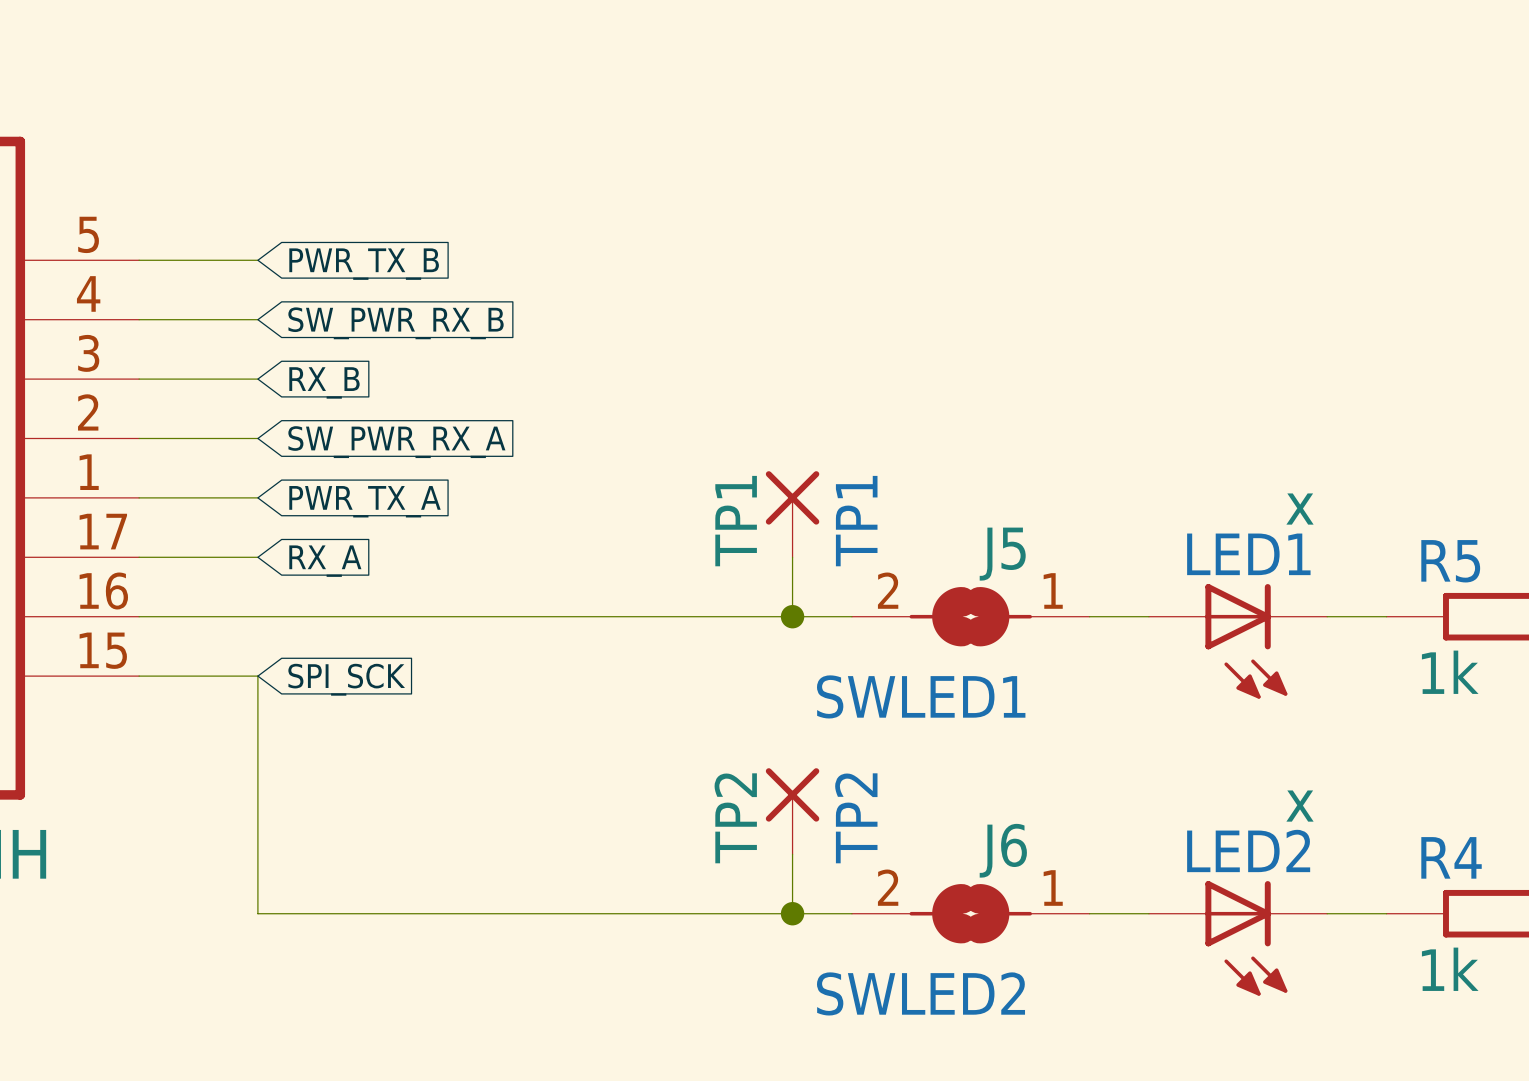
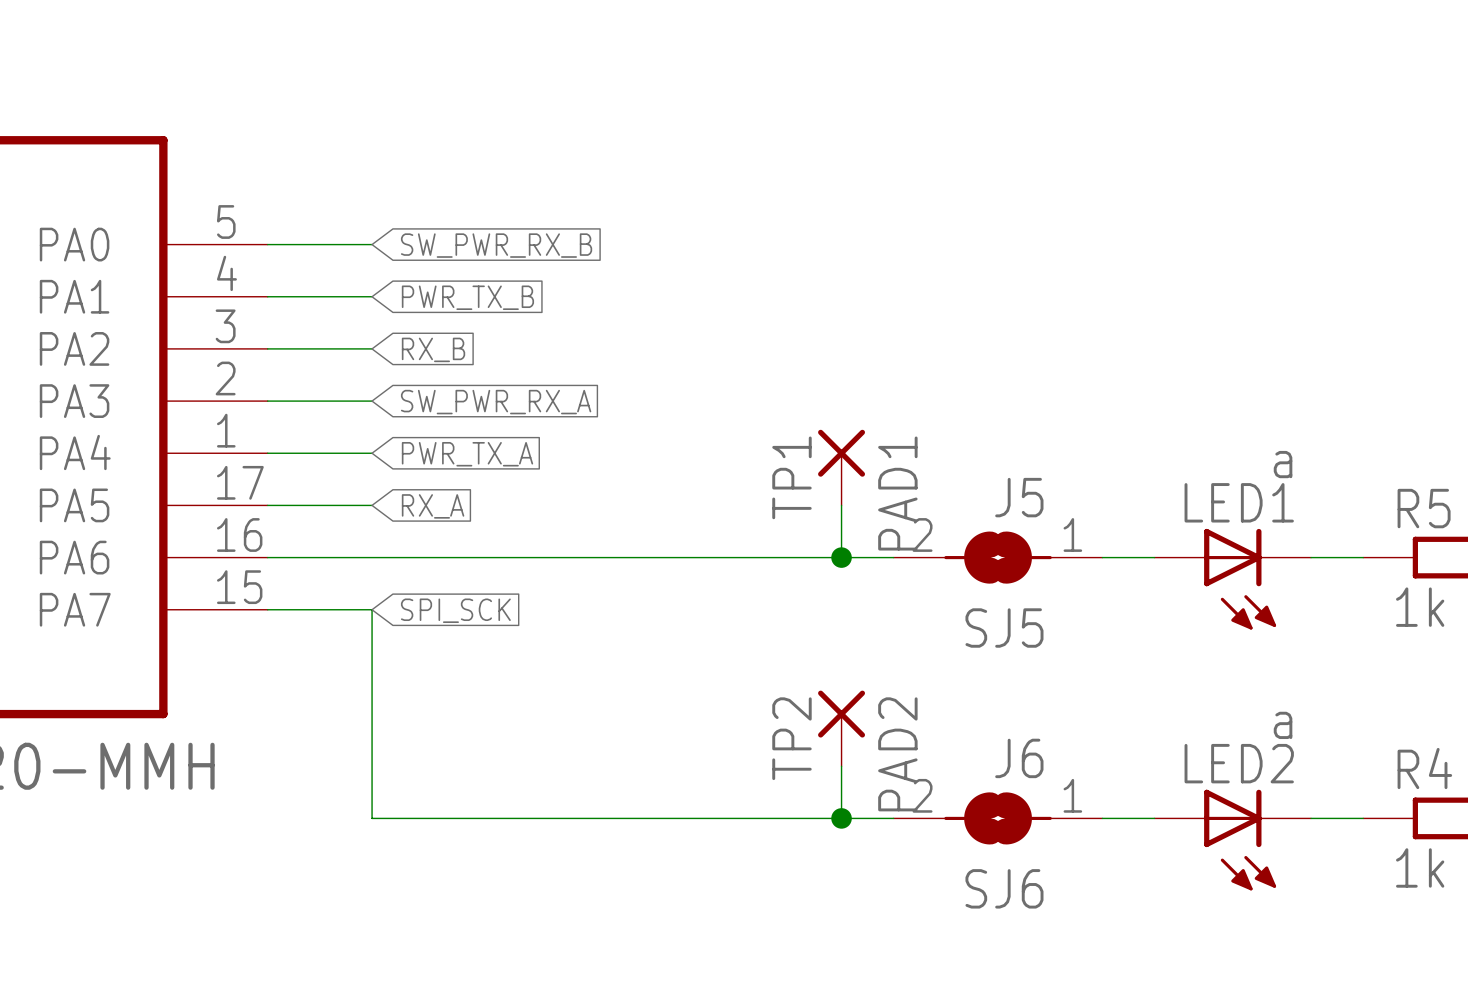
global label: PWR_TX_B (364, 264) -> SW_PWR_RX_B (496, 245)
global label: SW_PWR_RX_B (396, 323) -> PWR_TX_B (467, 297)
LED1 value: x (1300, 509) -> a (1283, 464)
TP1 name: TP1 (856, 521) -> PAD1 (897, 493)
SWLED1 name: SWLED1 (921, 696) -> SJ5 (1004, 628)
LED2 value: x (1300, 806) -> a (1283, 725)
TP2 name: TP2 (856, 818) -> PAD2 (897, 754)
SWLED2 name: SWLED2 (921, 993) -> SJ6 (1004, 888)

